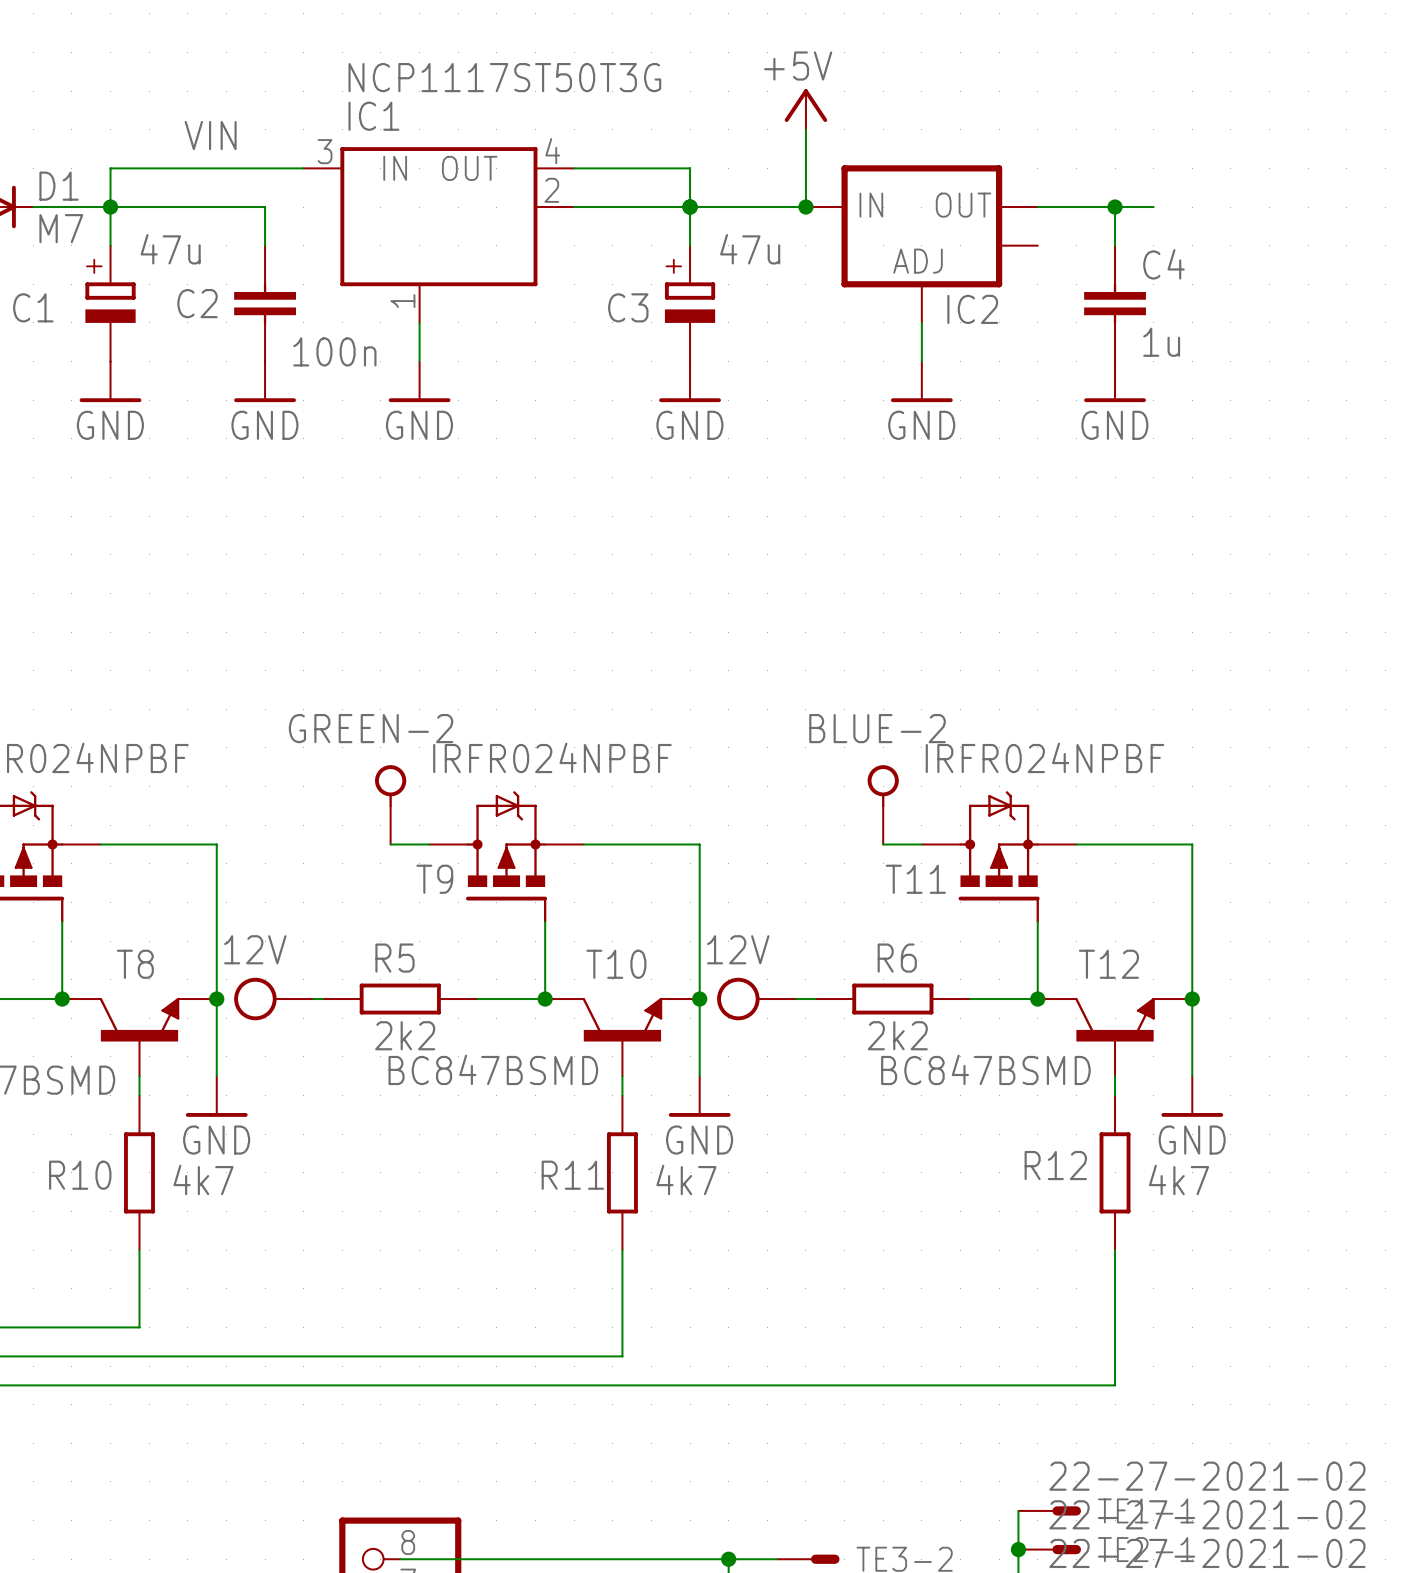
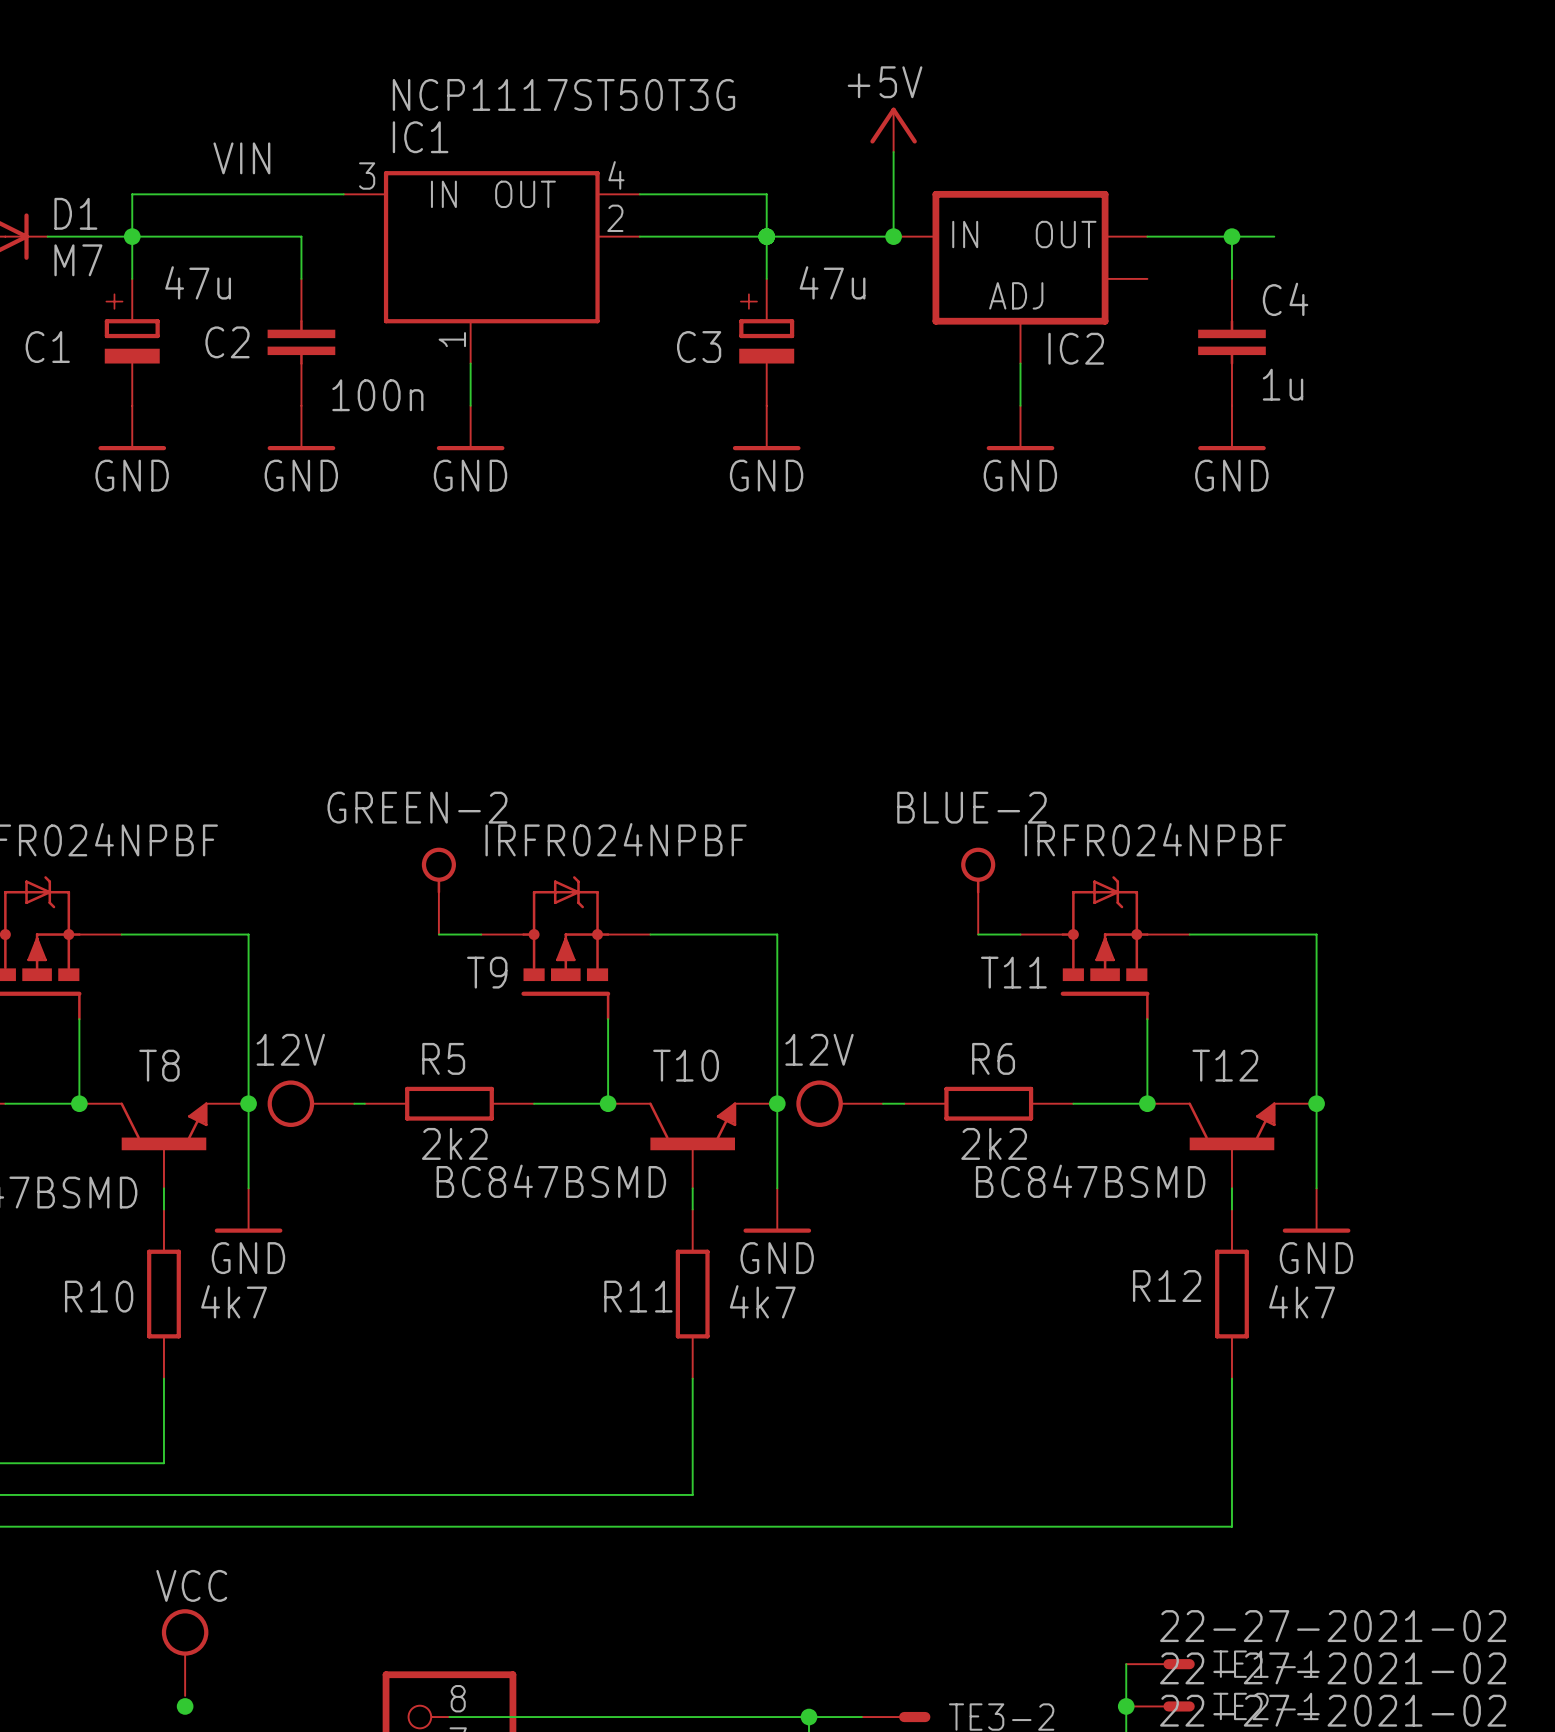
power symbol: none -> VCC (185, 1652)
junction: none -> (185, 1706)

